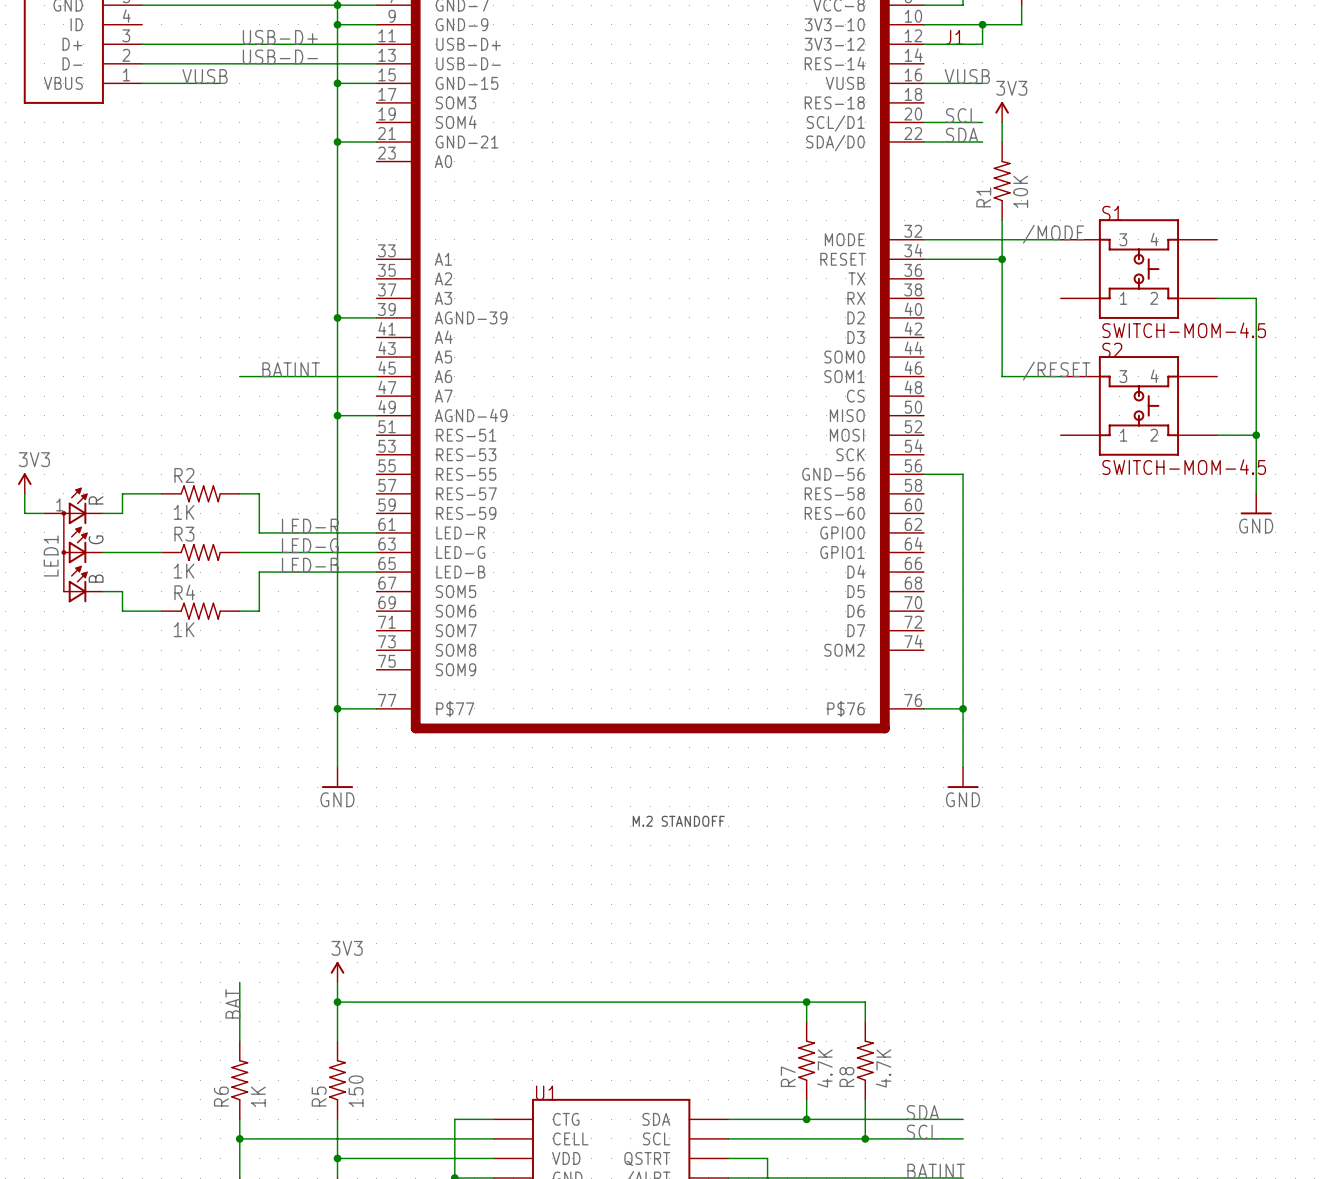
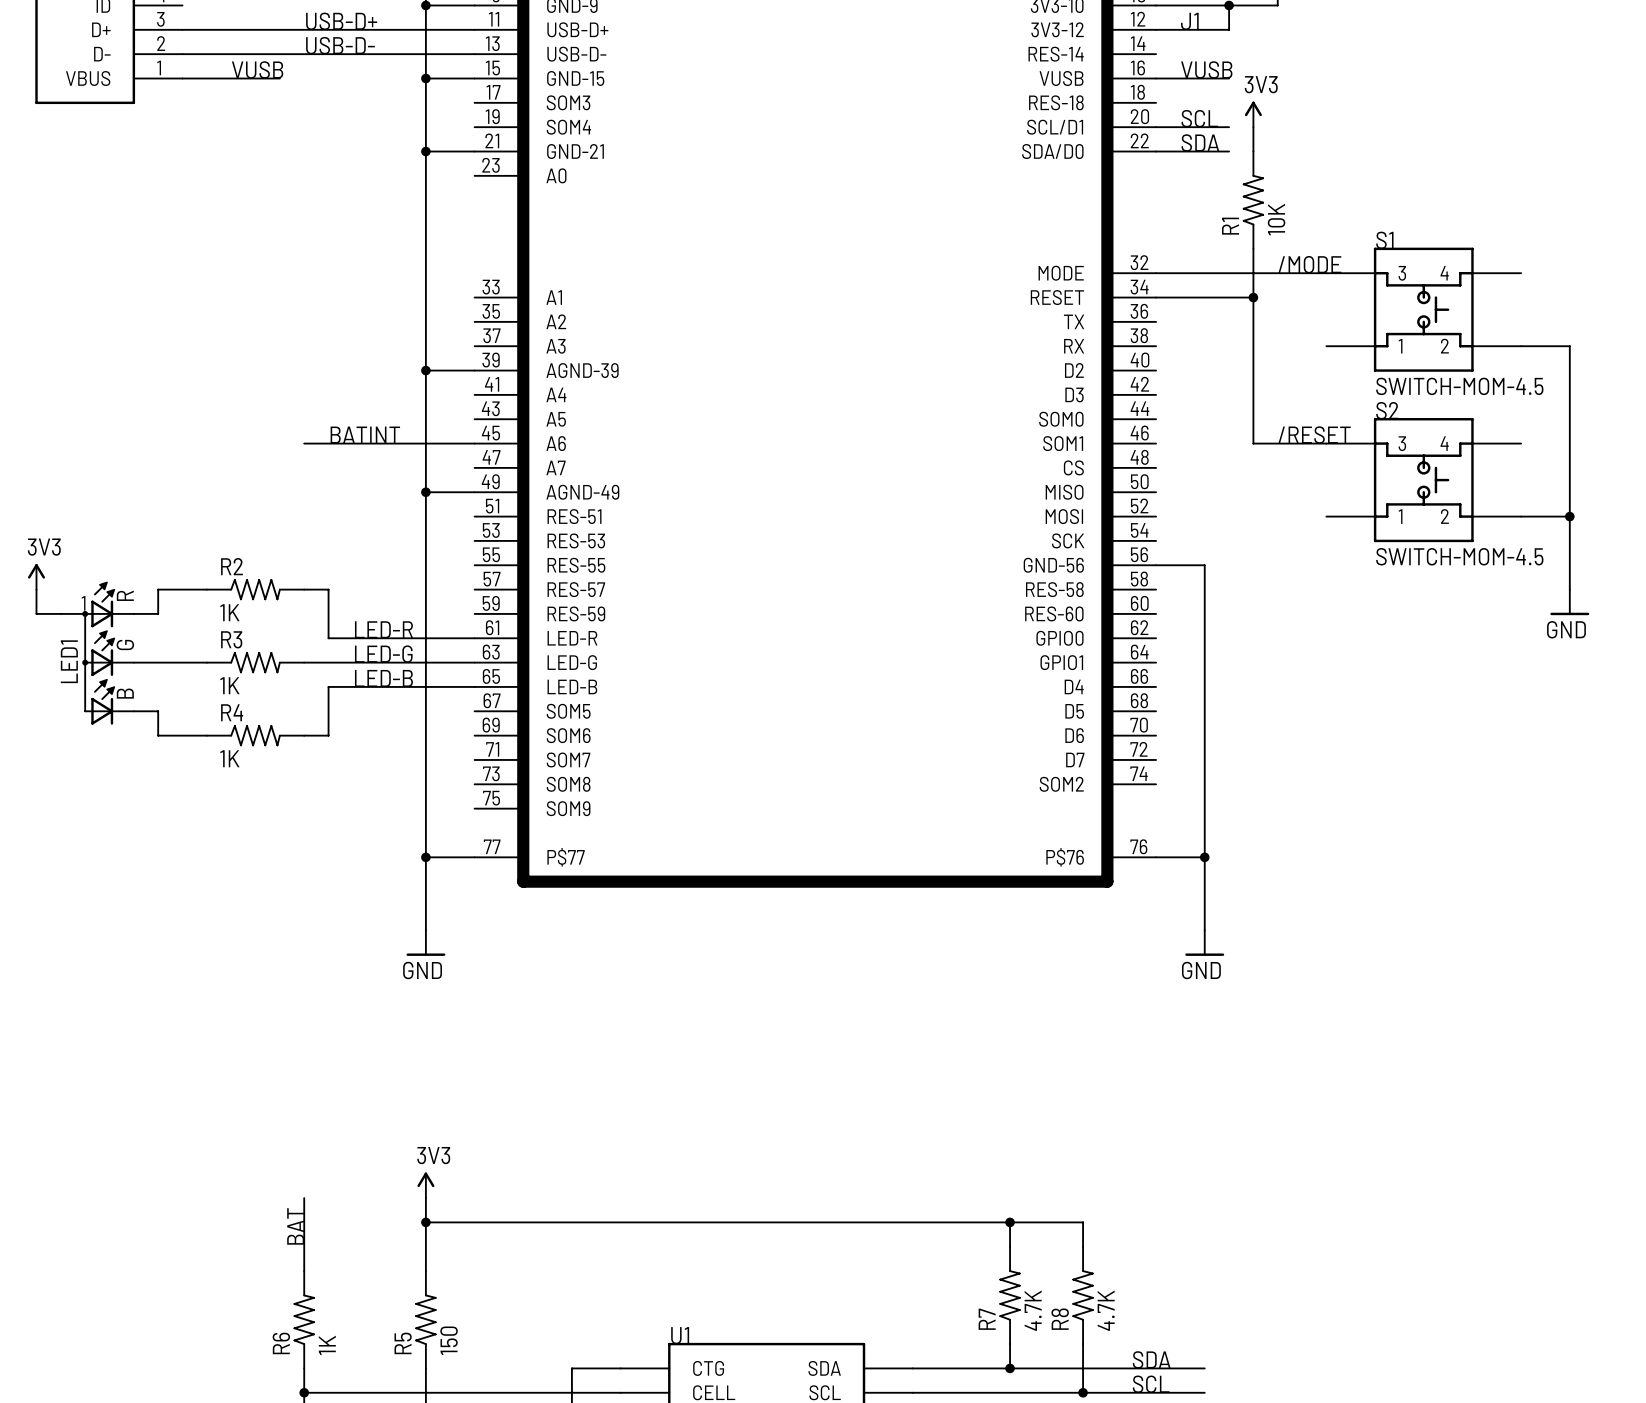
part: (678, 821) -> none

